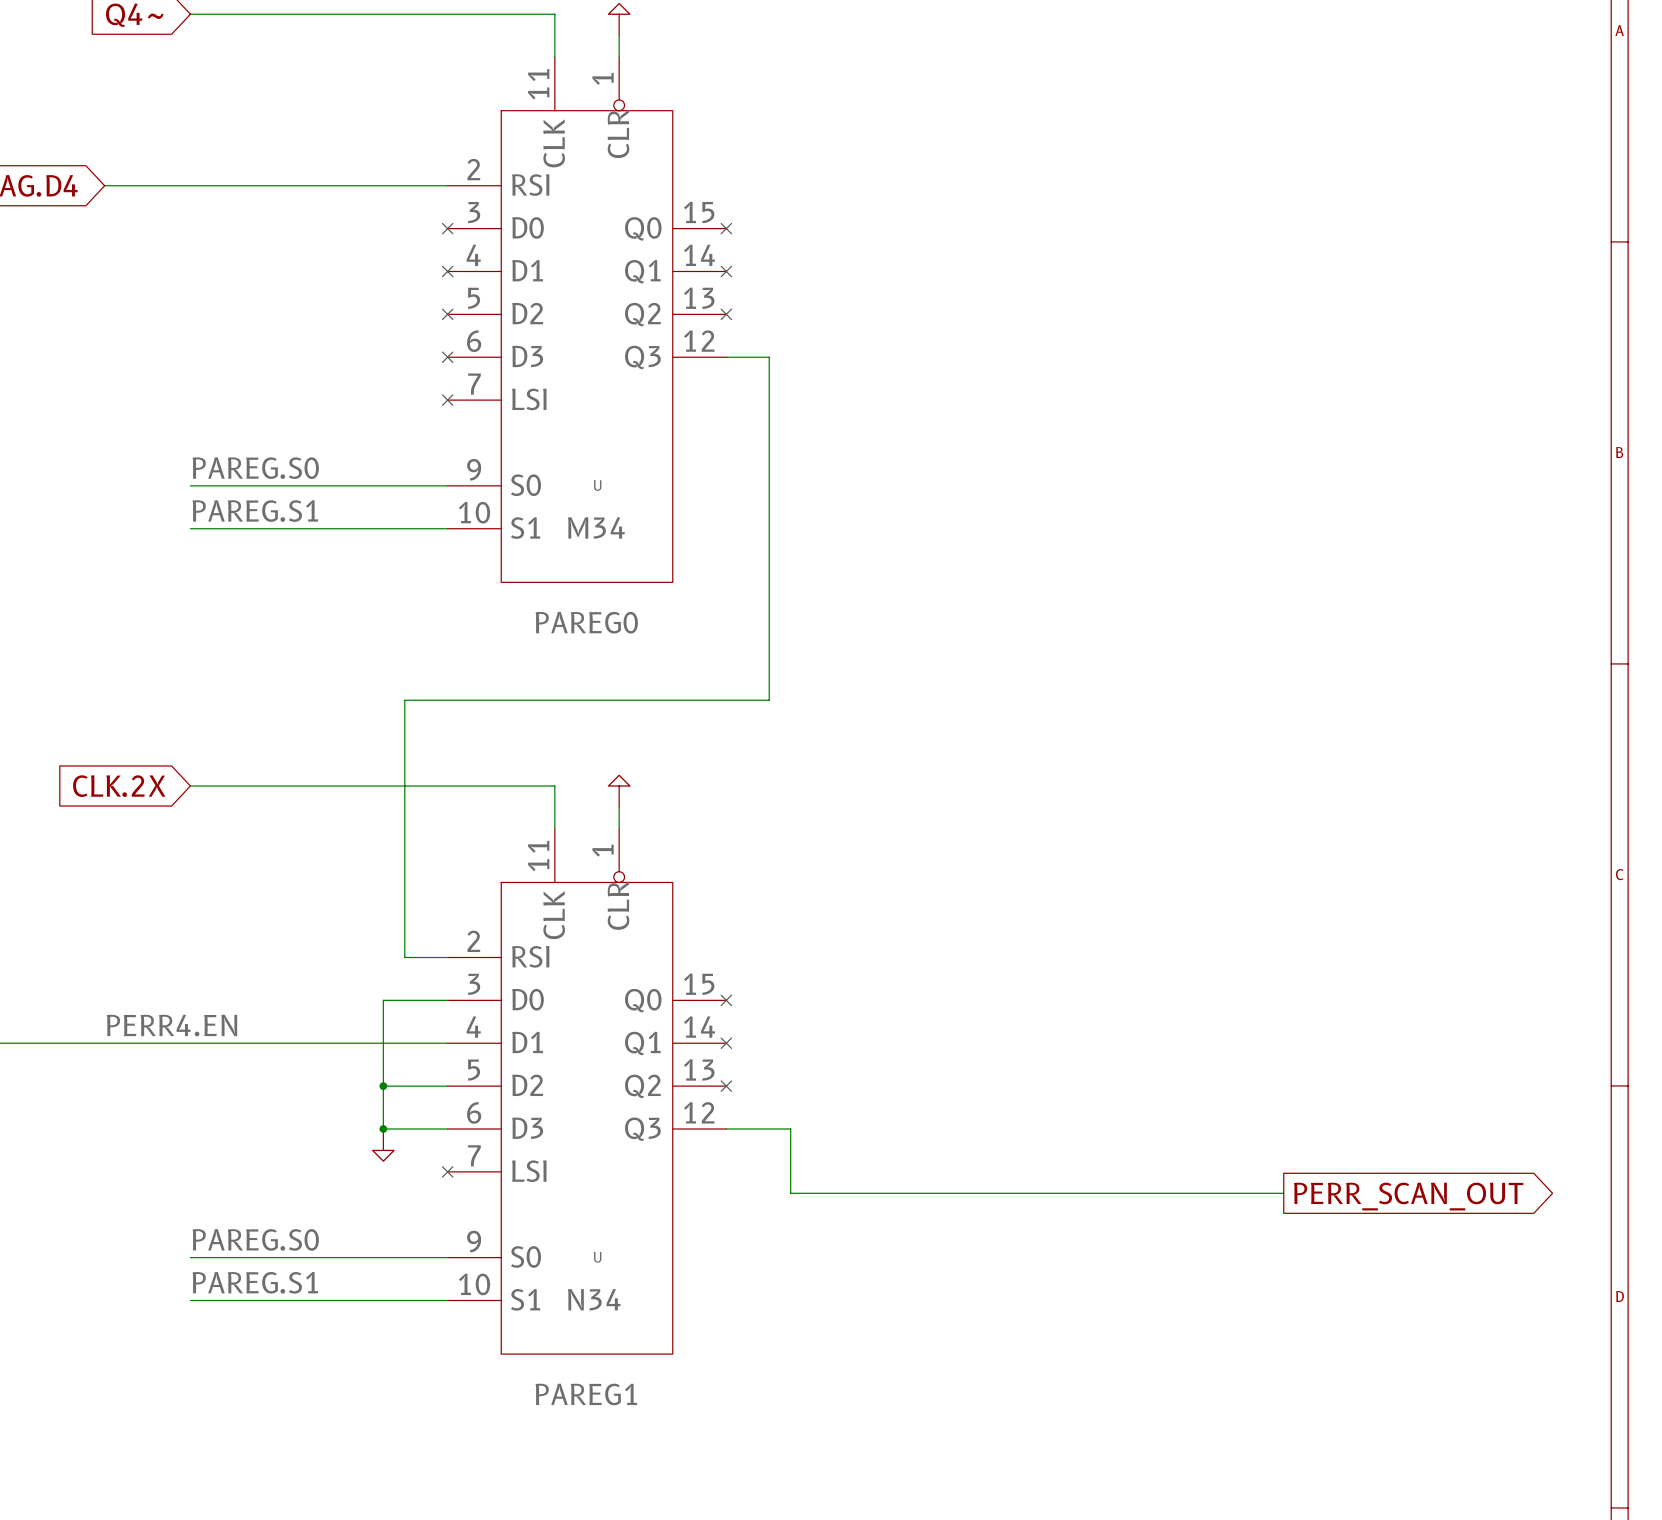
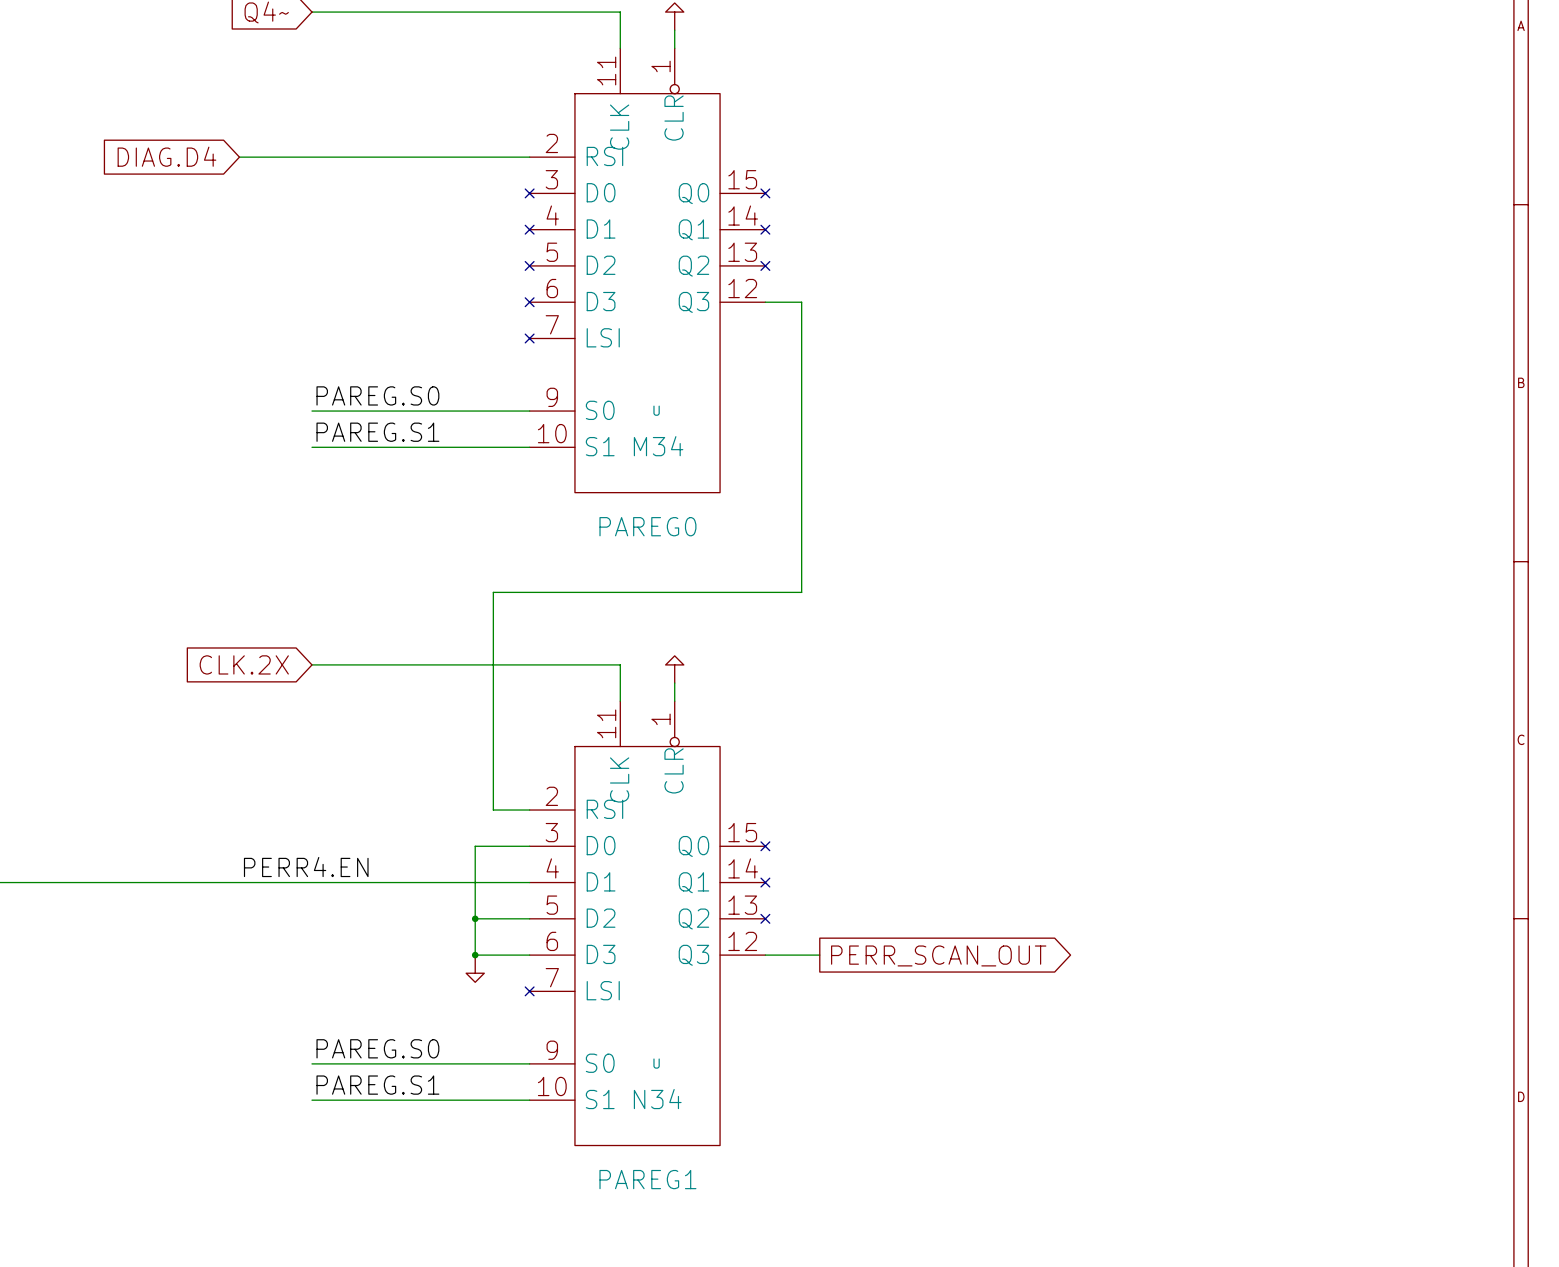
wire: (790, 1128) (790, 1193) (1283, 1193) -> none
global label: none -> PERR_SCAN_OUT (938, 955)
global label: PERR_SCAN_OUT (1408, 1196) -> none

